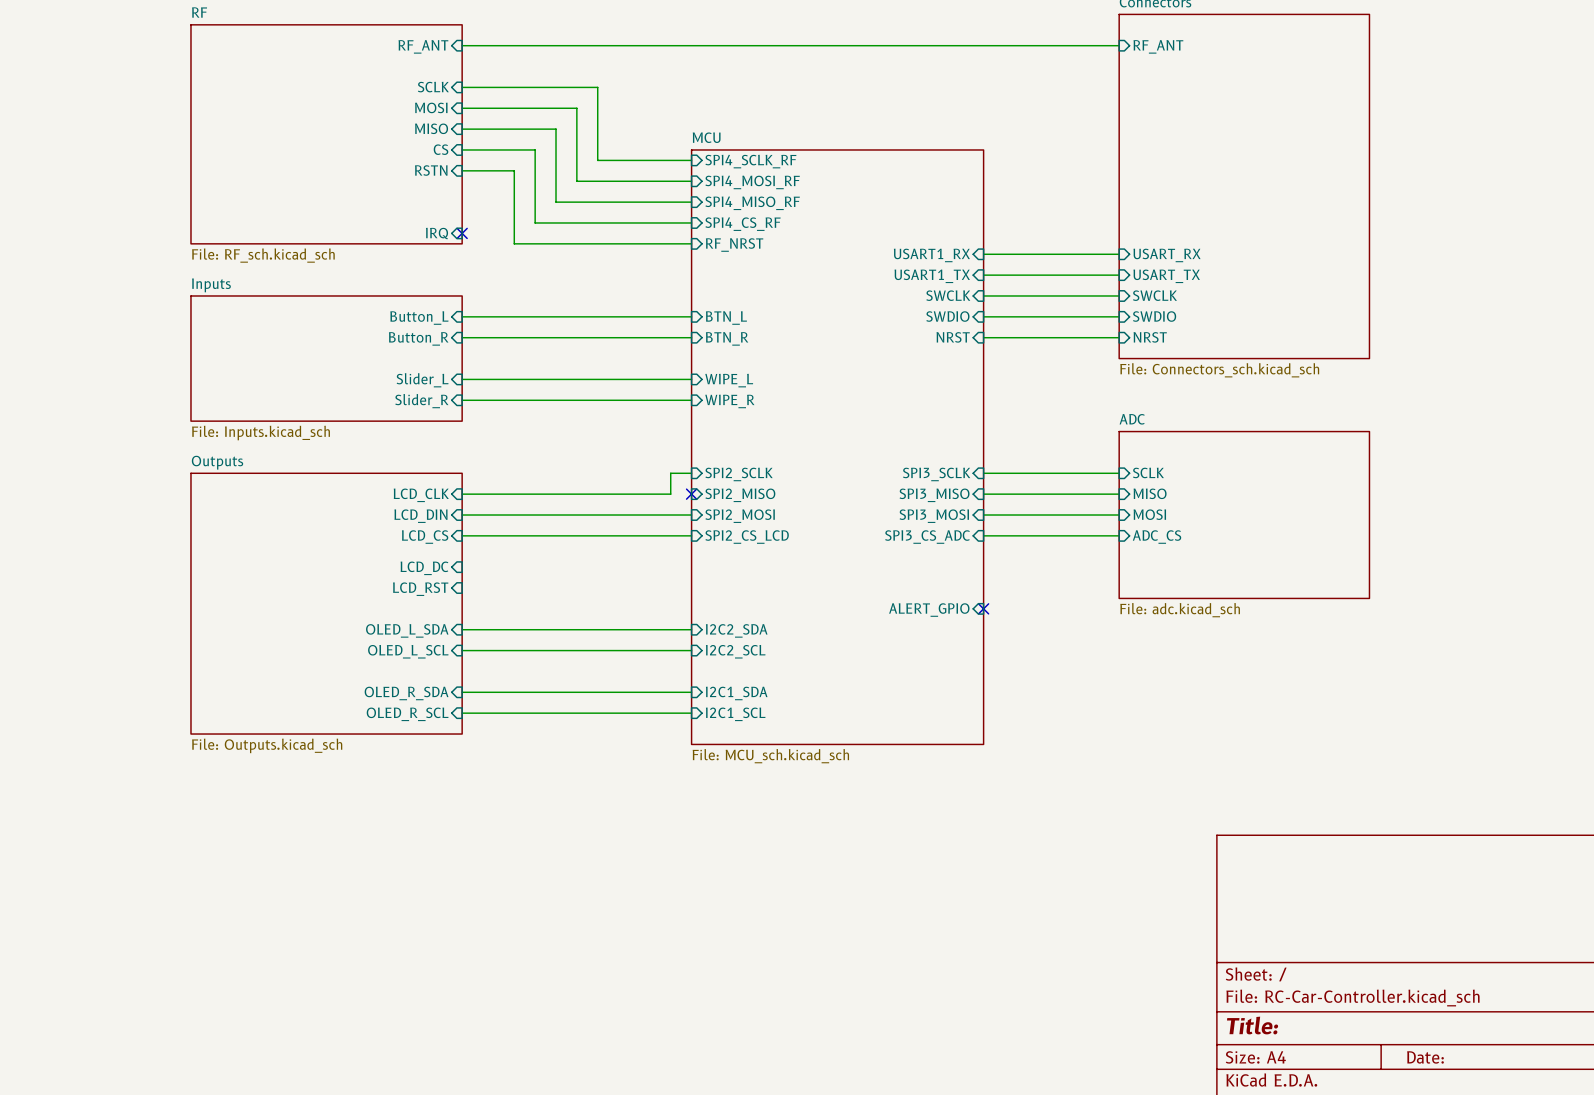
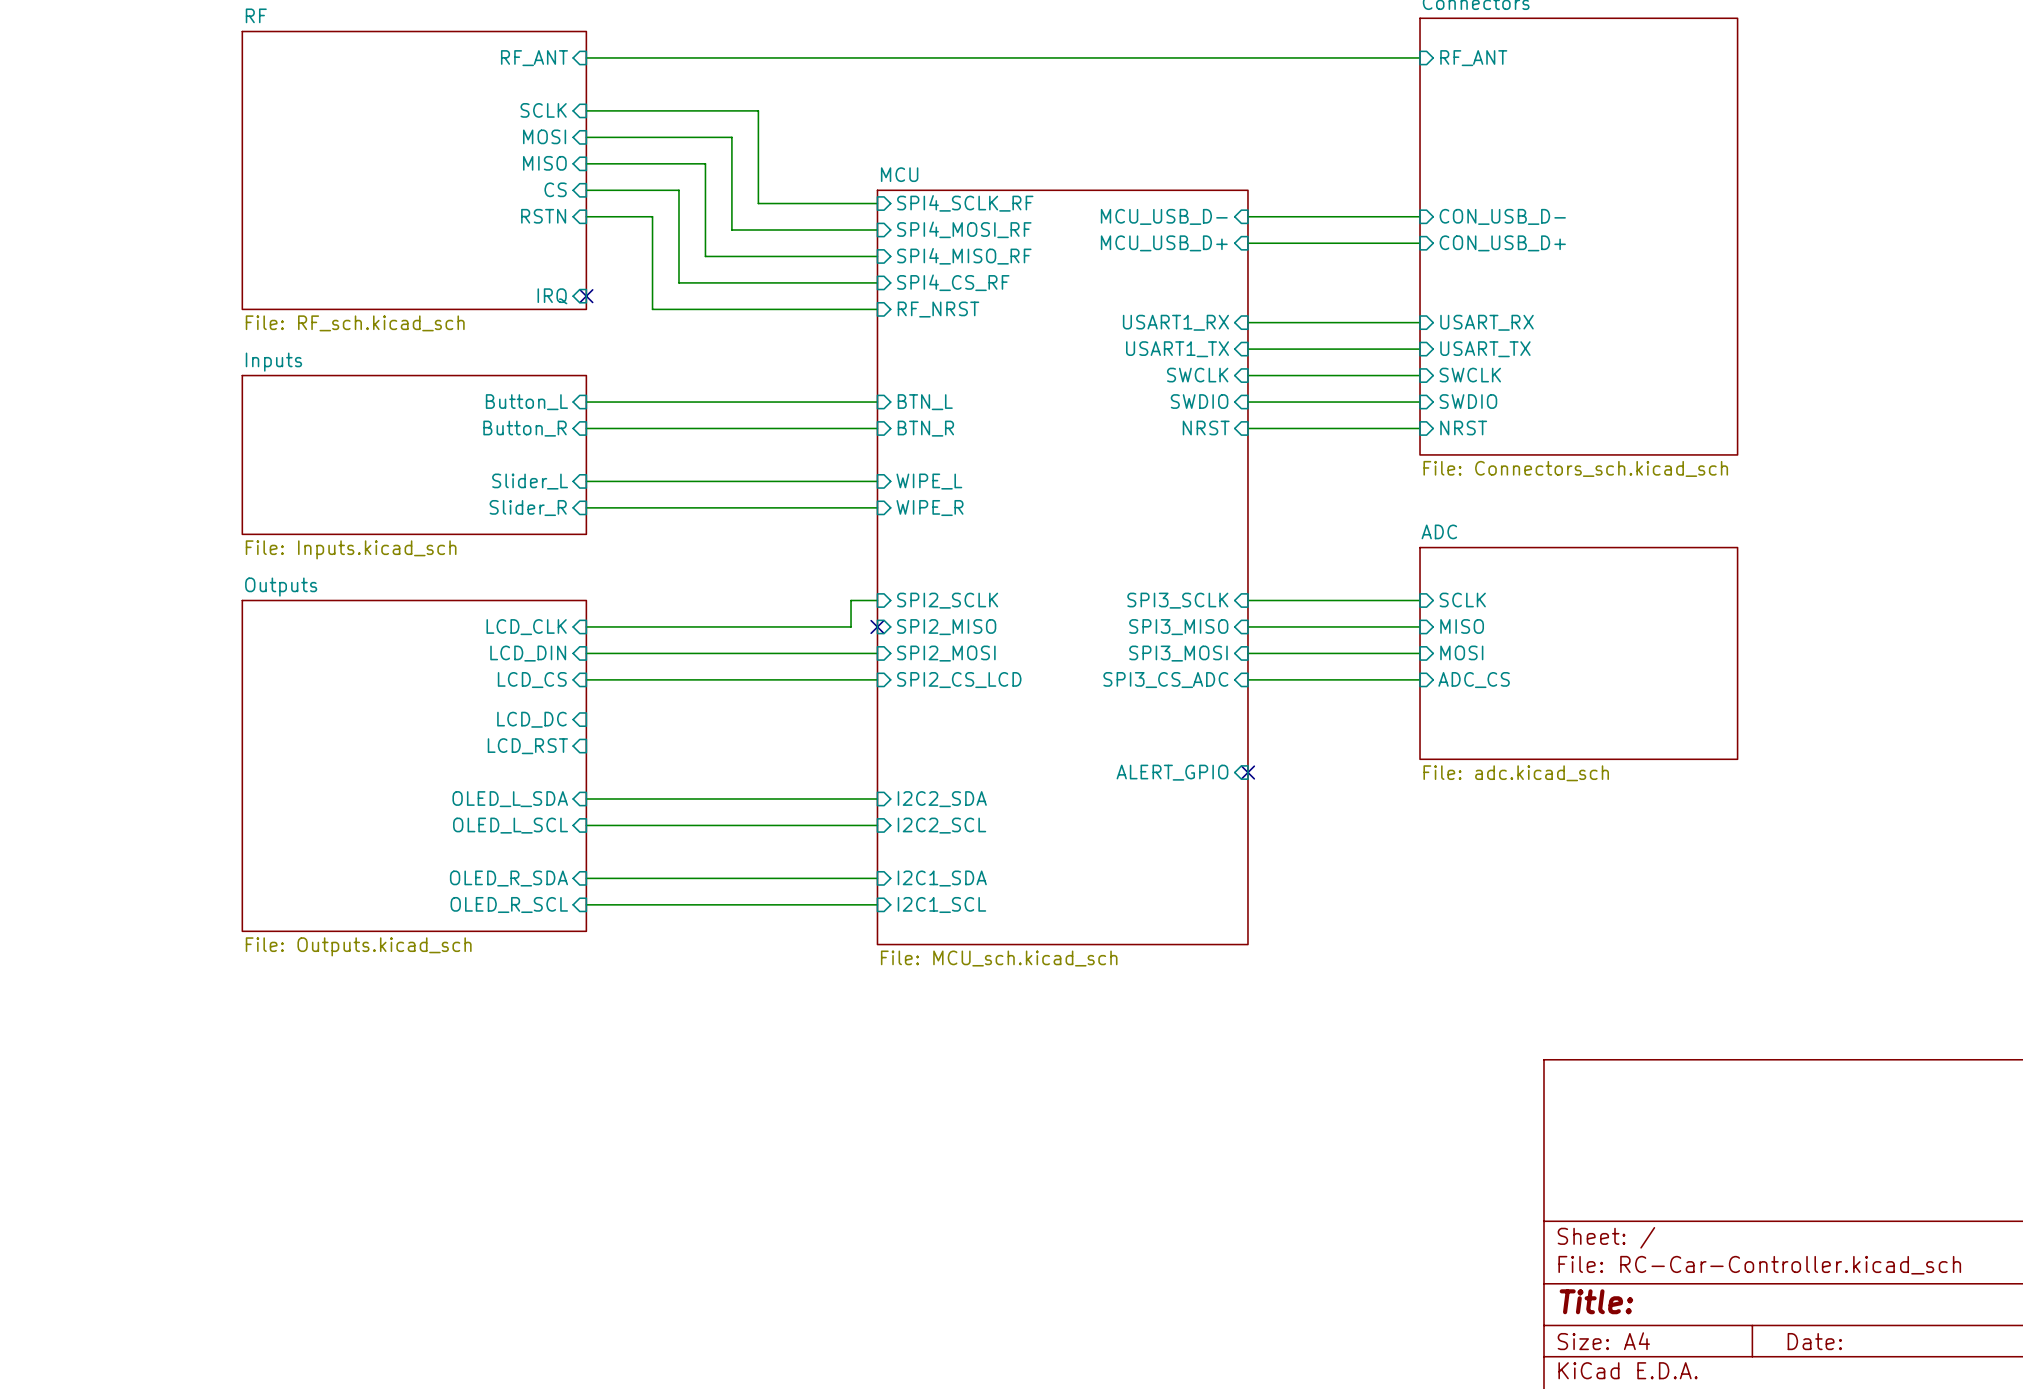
wire: none -> (1247, 216) (1420, 216)
sheet pin: none -> MCU_USB_D- (1164, 216)
sheet pin: none -> CON_USB_D- (1502, 216)
wire: none -> (1247, 243) (1420, 243)
sheet pin: none -> MCU_USB_D+ (1164, 243)
sheet pin: none -> CON_USB_D+ (1502, 243)

